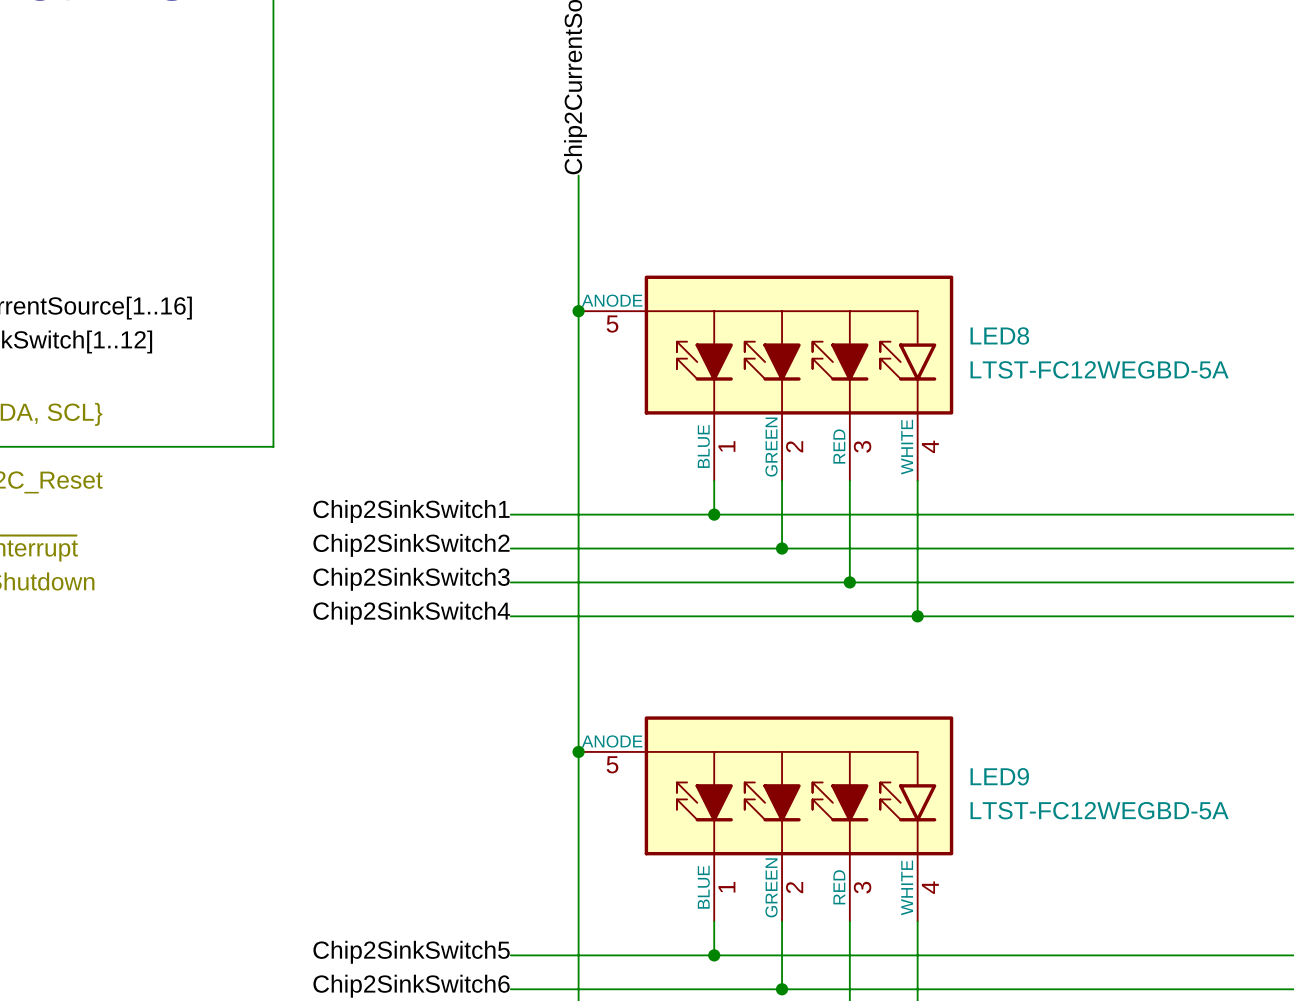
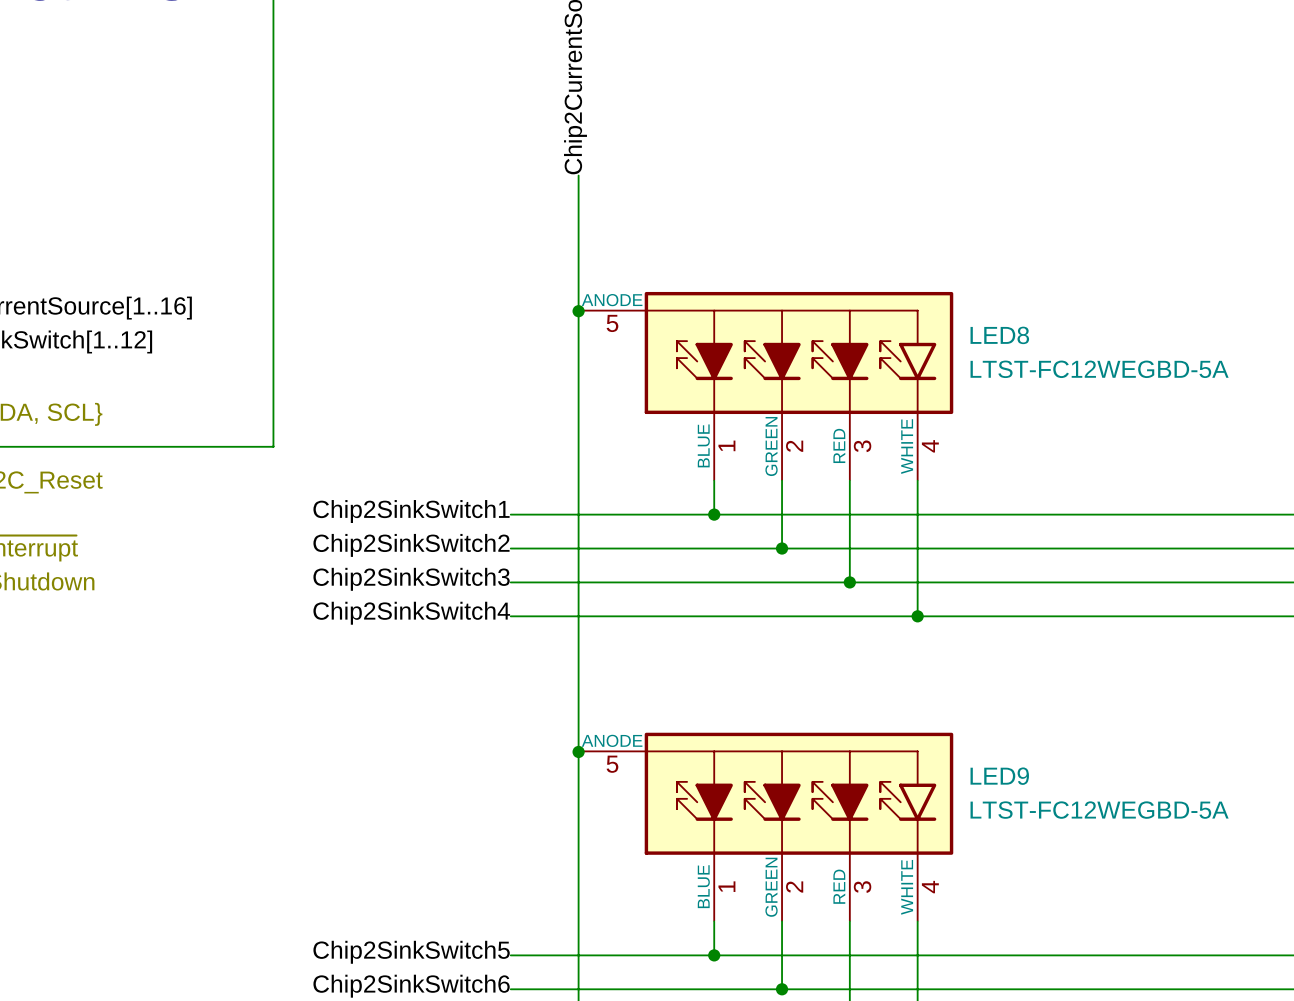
LED8 symbol: [578, 275, 954, 481] -> [578, 291, 954, 481]
LED9 symbol: [578, 716, 954, 922] -> [578, 732, 954, 921]

